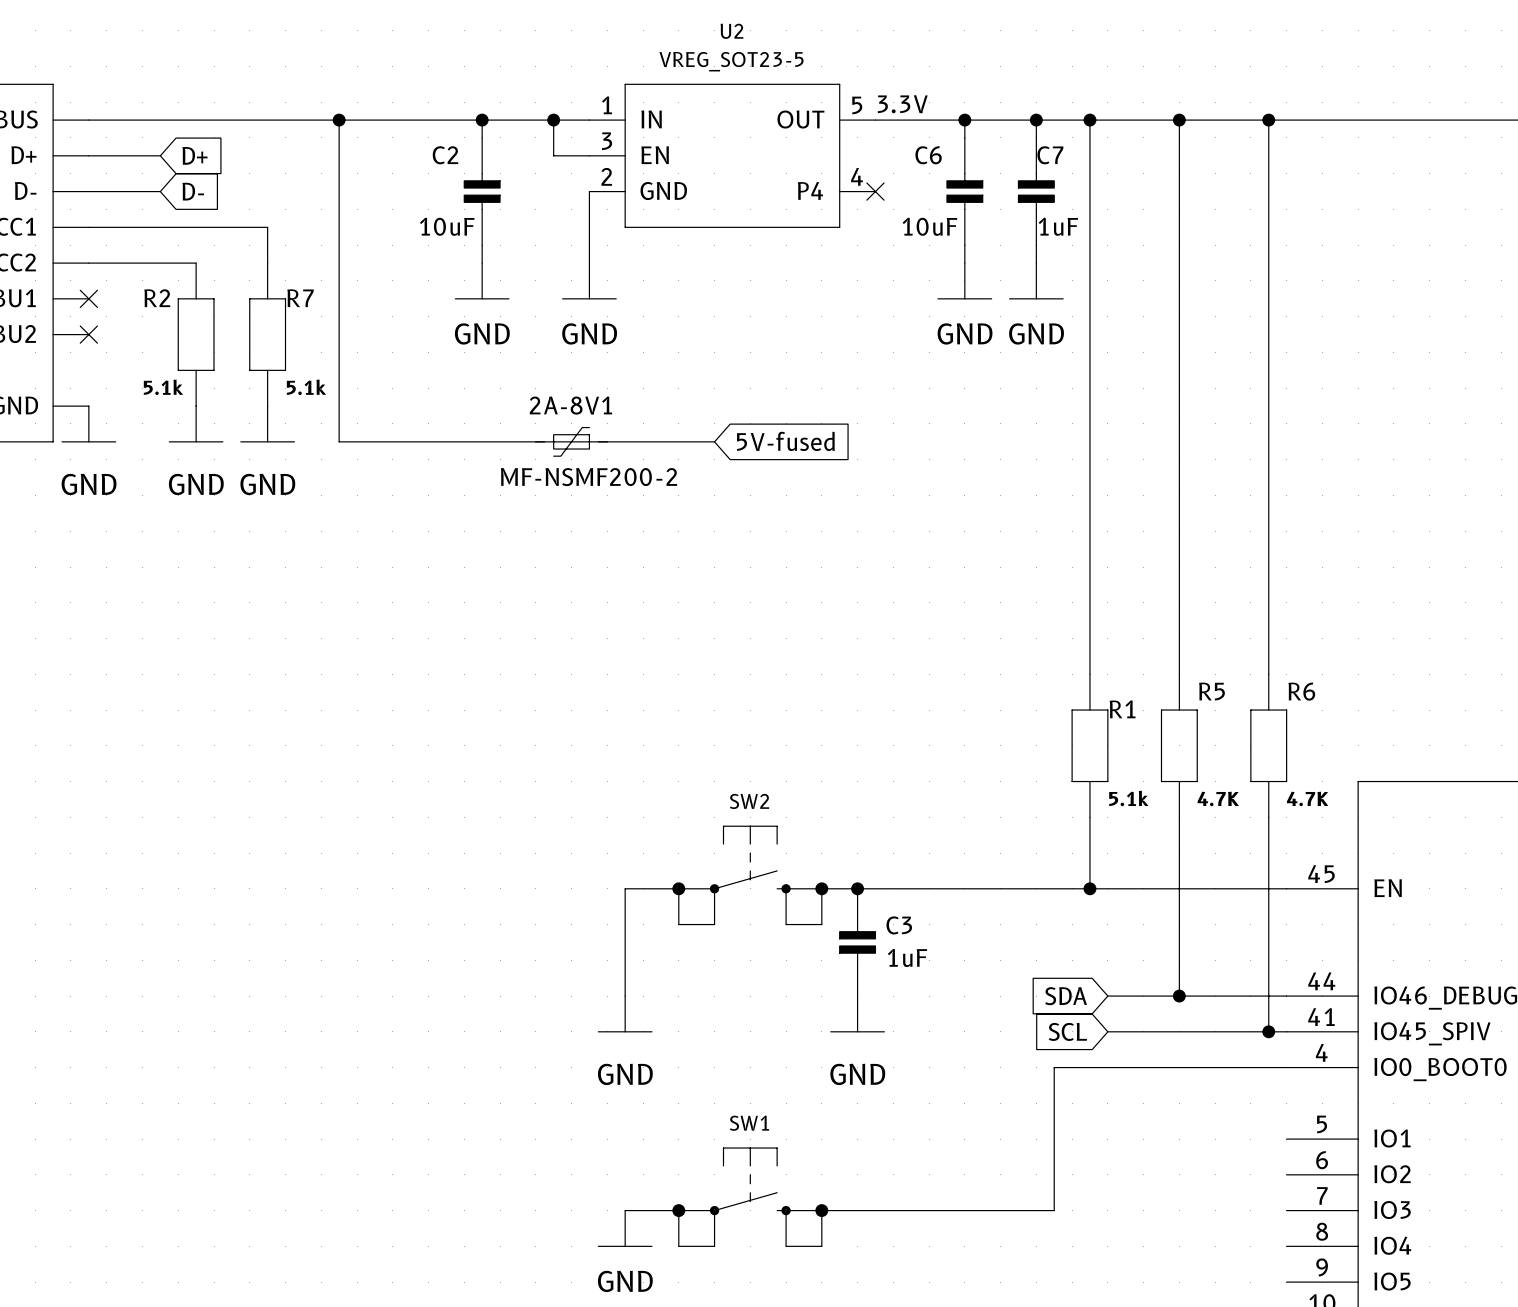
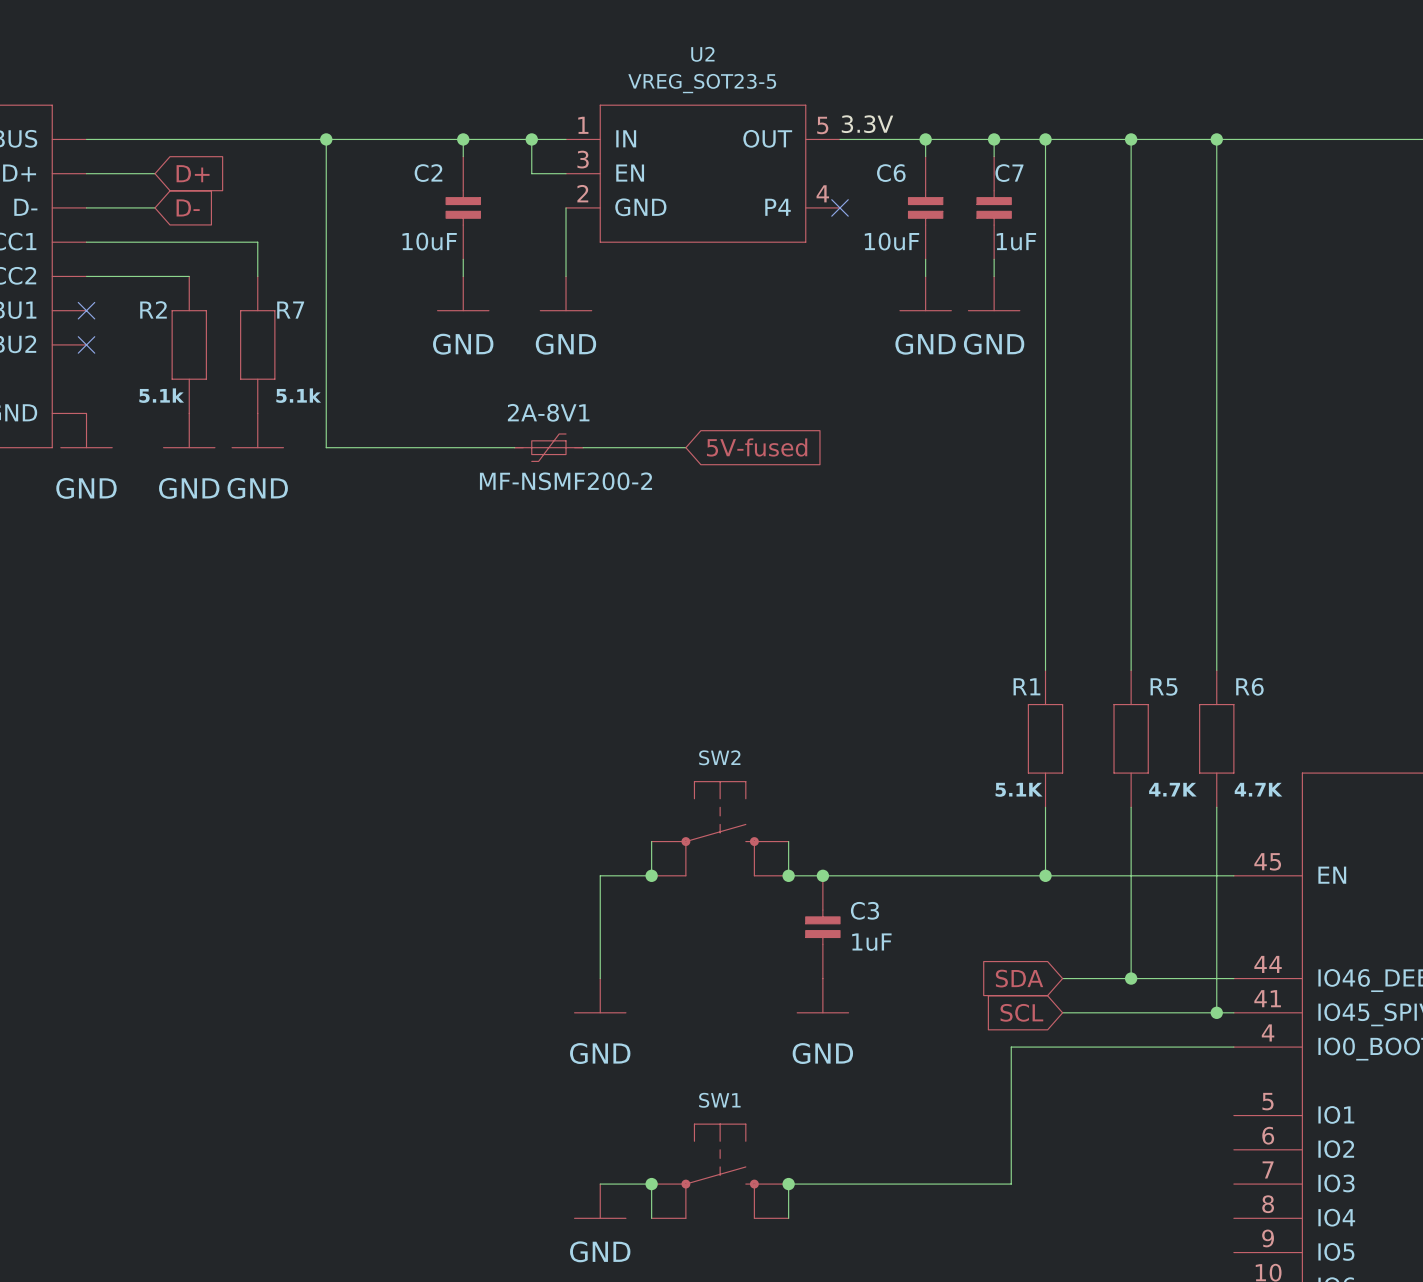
R1 name position: R1 (1122, 709) -> R1 (1026, 686)
R1 value: 5.1k (1128, 798) -> 5.1K (1019, 789)
SW2 position: (750, 875) -> (720, 828)
wire: (678, 888) (678, 924) -> (651, 875) (651, 841)
wire: (821, 888) (821, 924) -> (788, 875) (788, 841)

